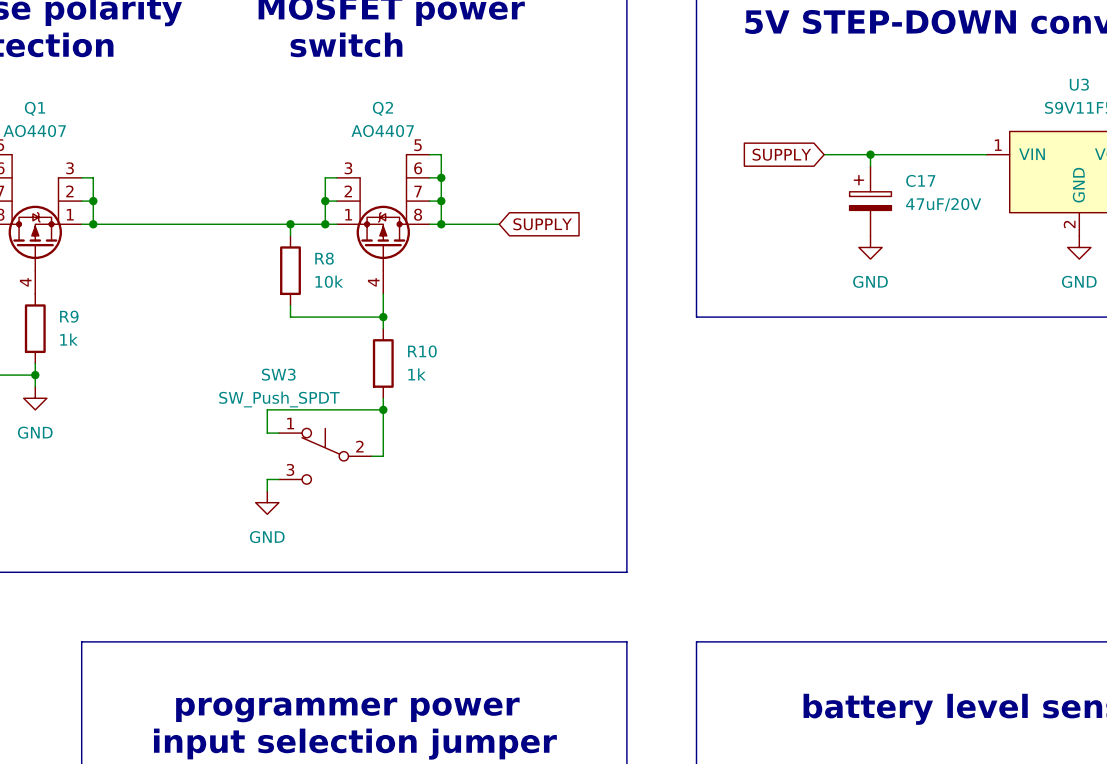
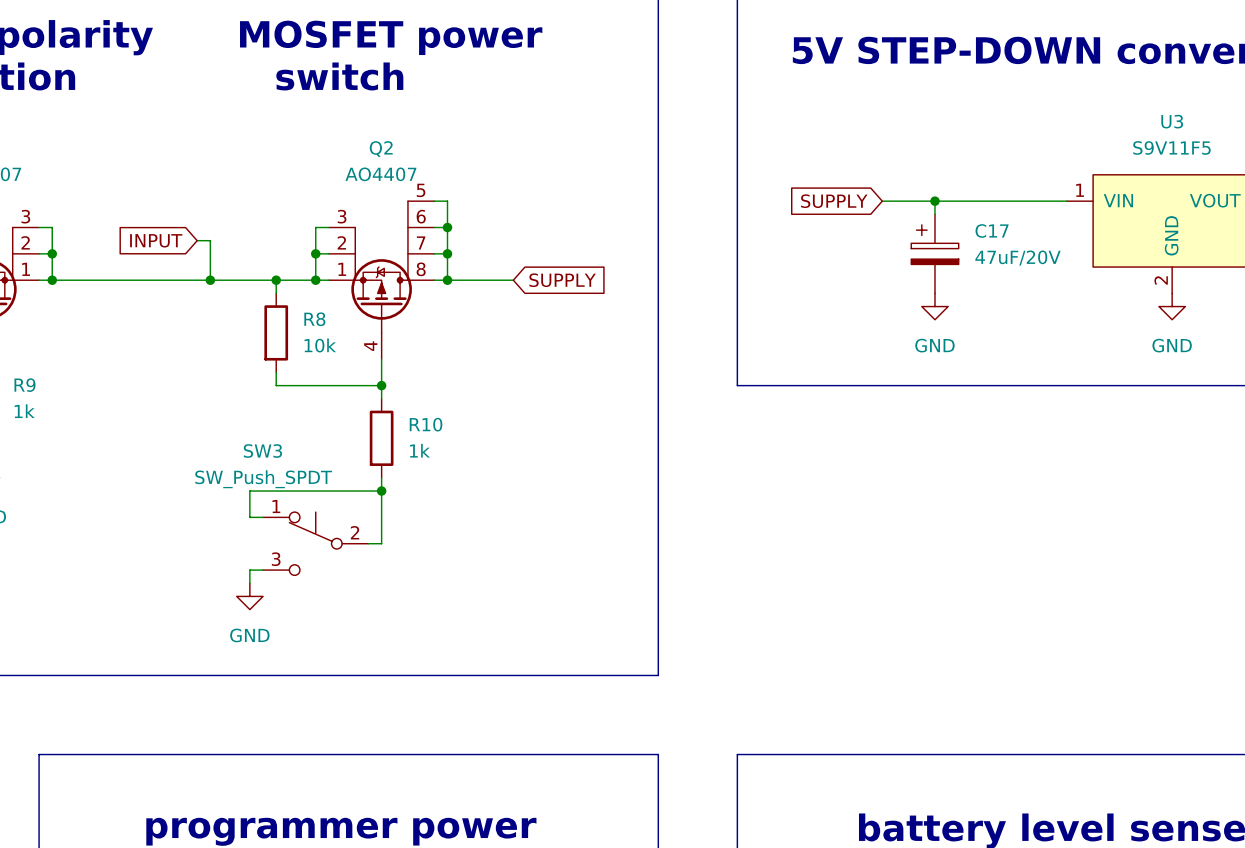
global label: none -> INPUT (156, 240)
wire: none -> (197, 240) (210, 240) (210, 280)
junction: none -> (210, 280)

